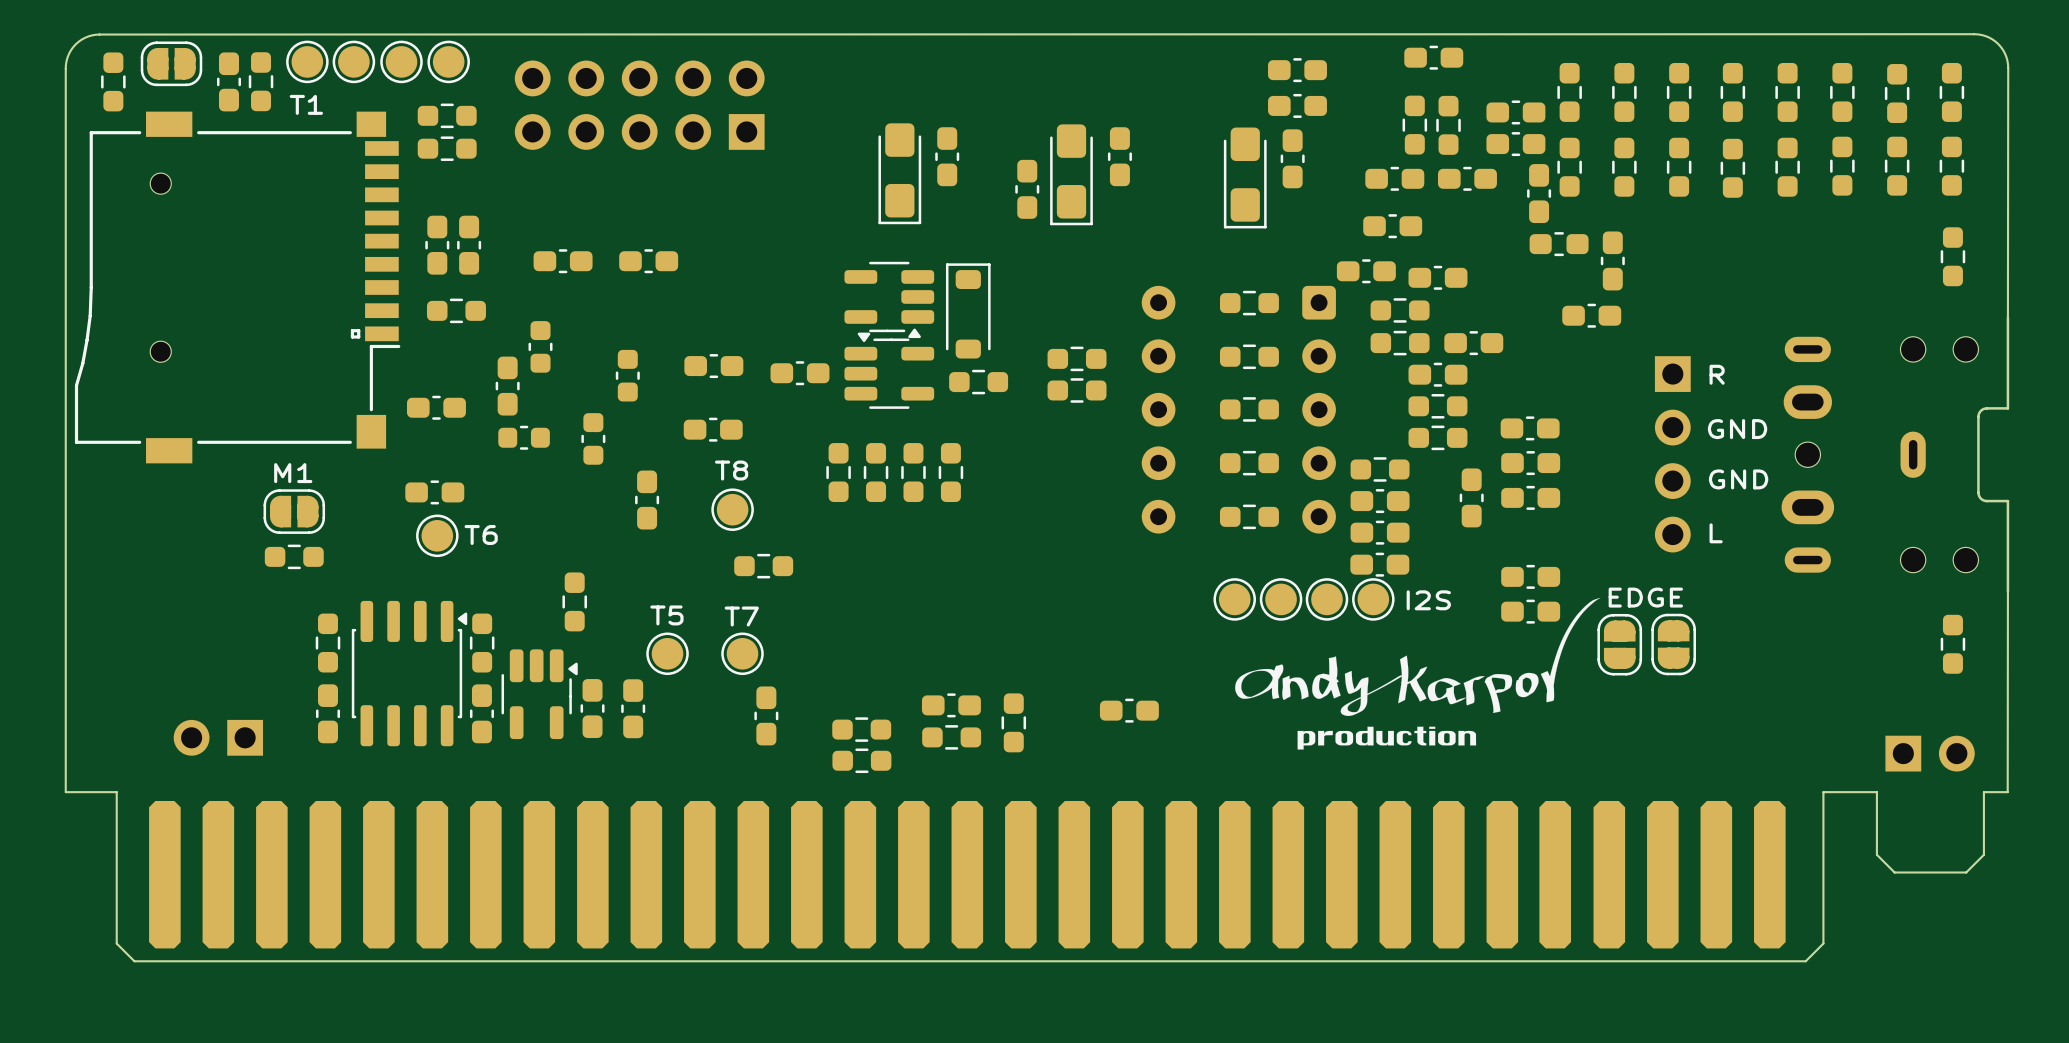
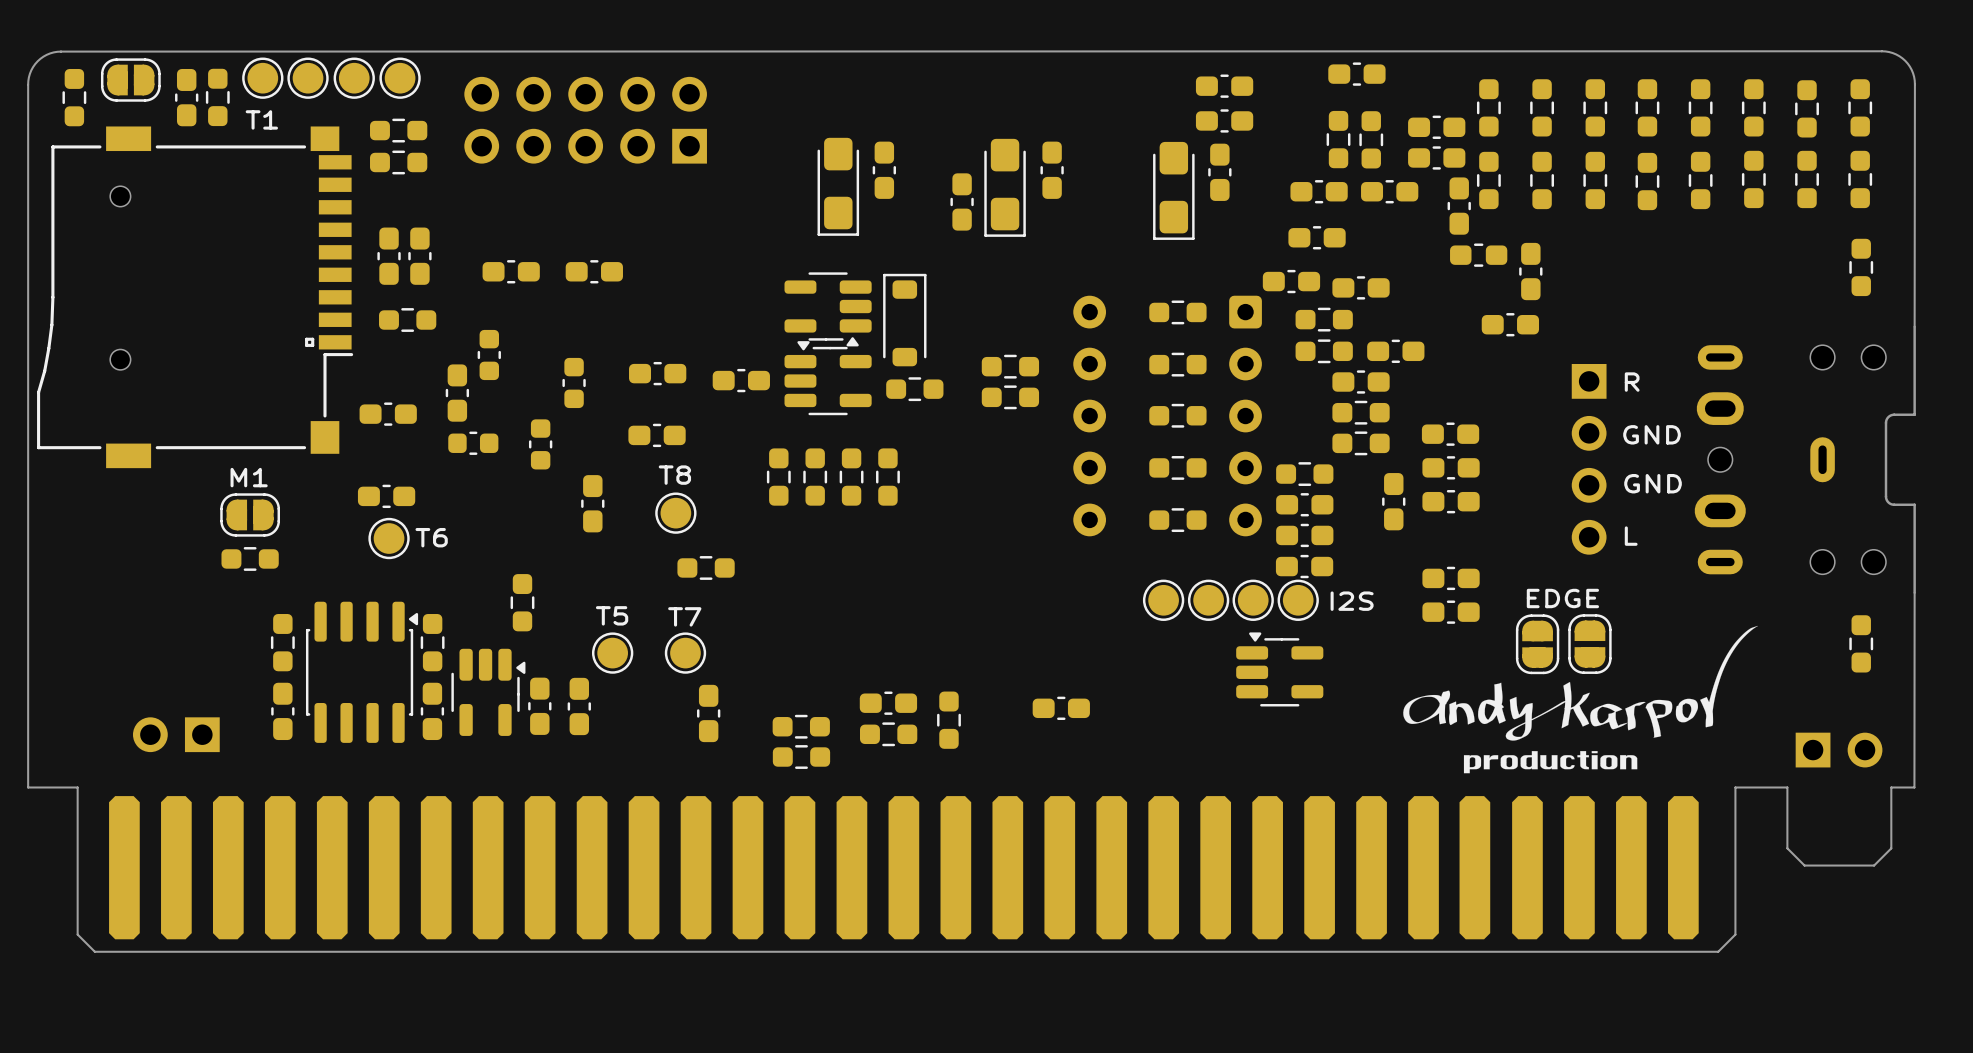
part: none -> (1279, 669)
drawing position: (1417, 673) -> (1580, 699)

